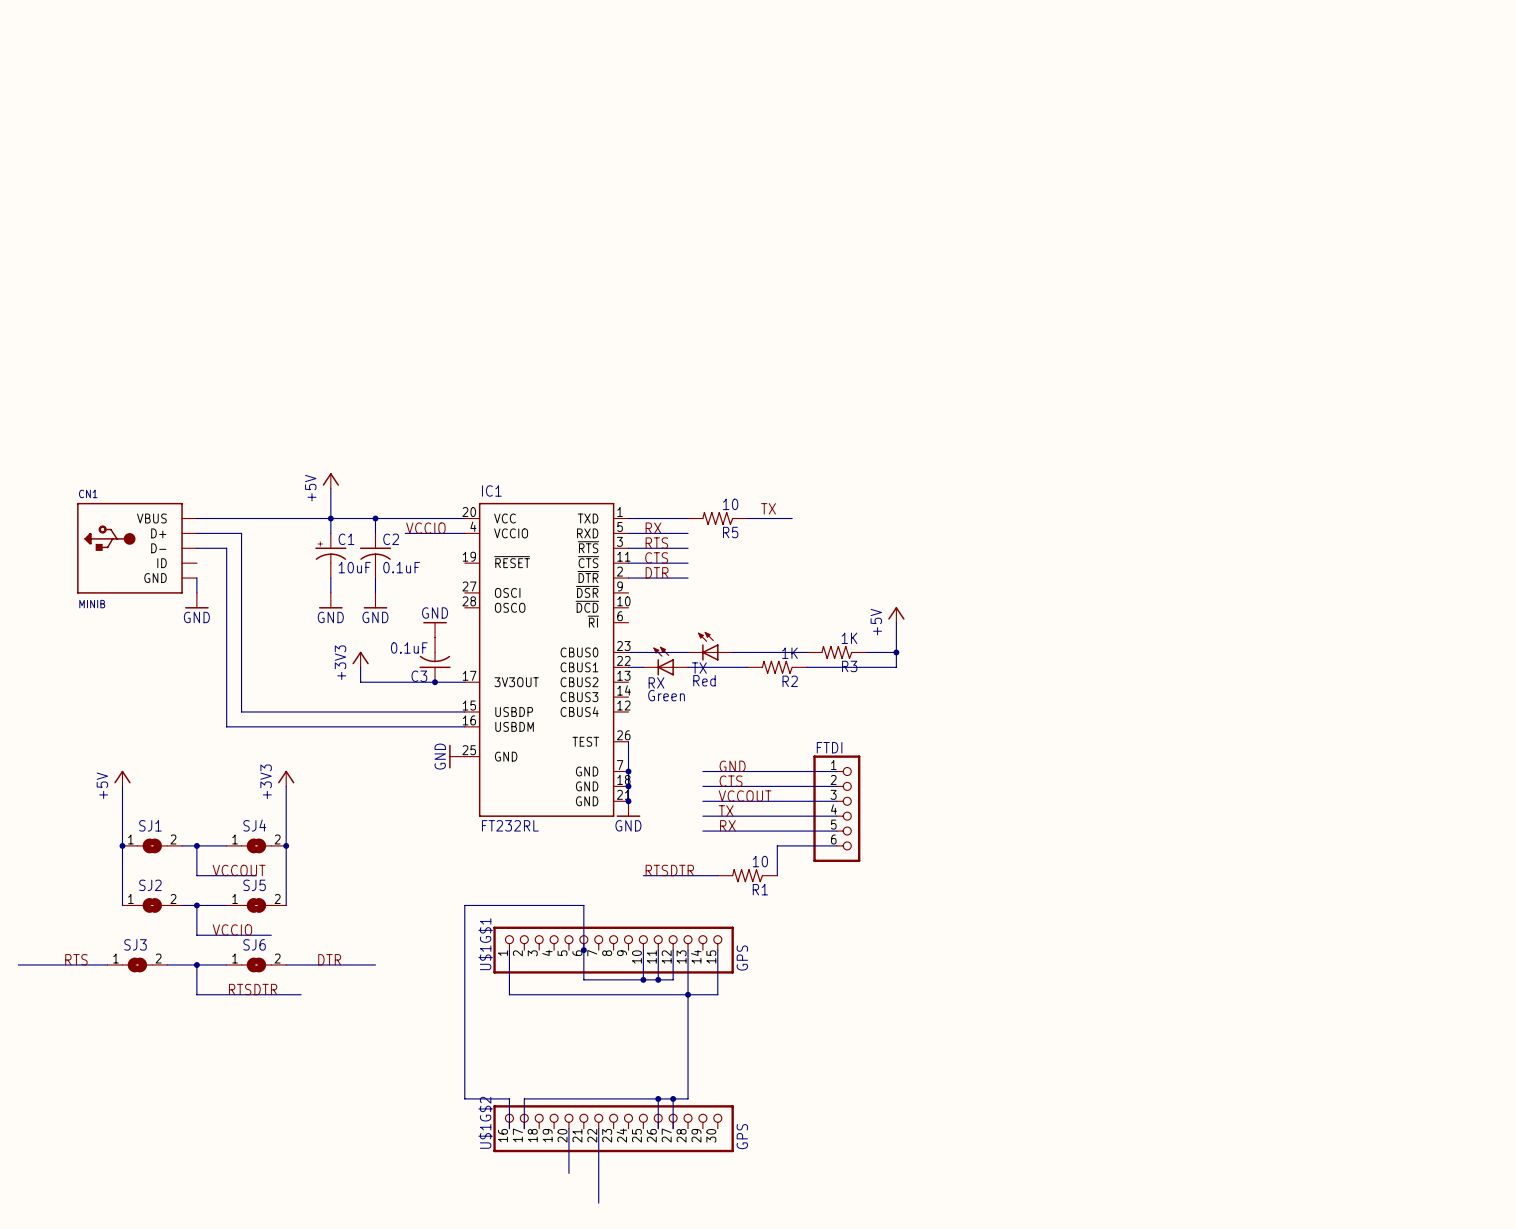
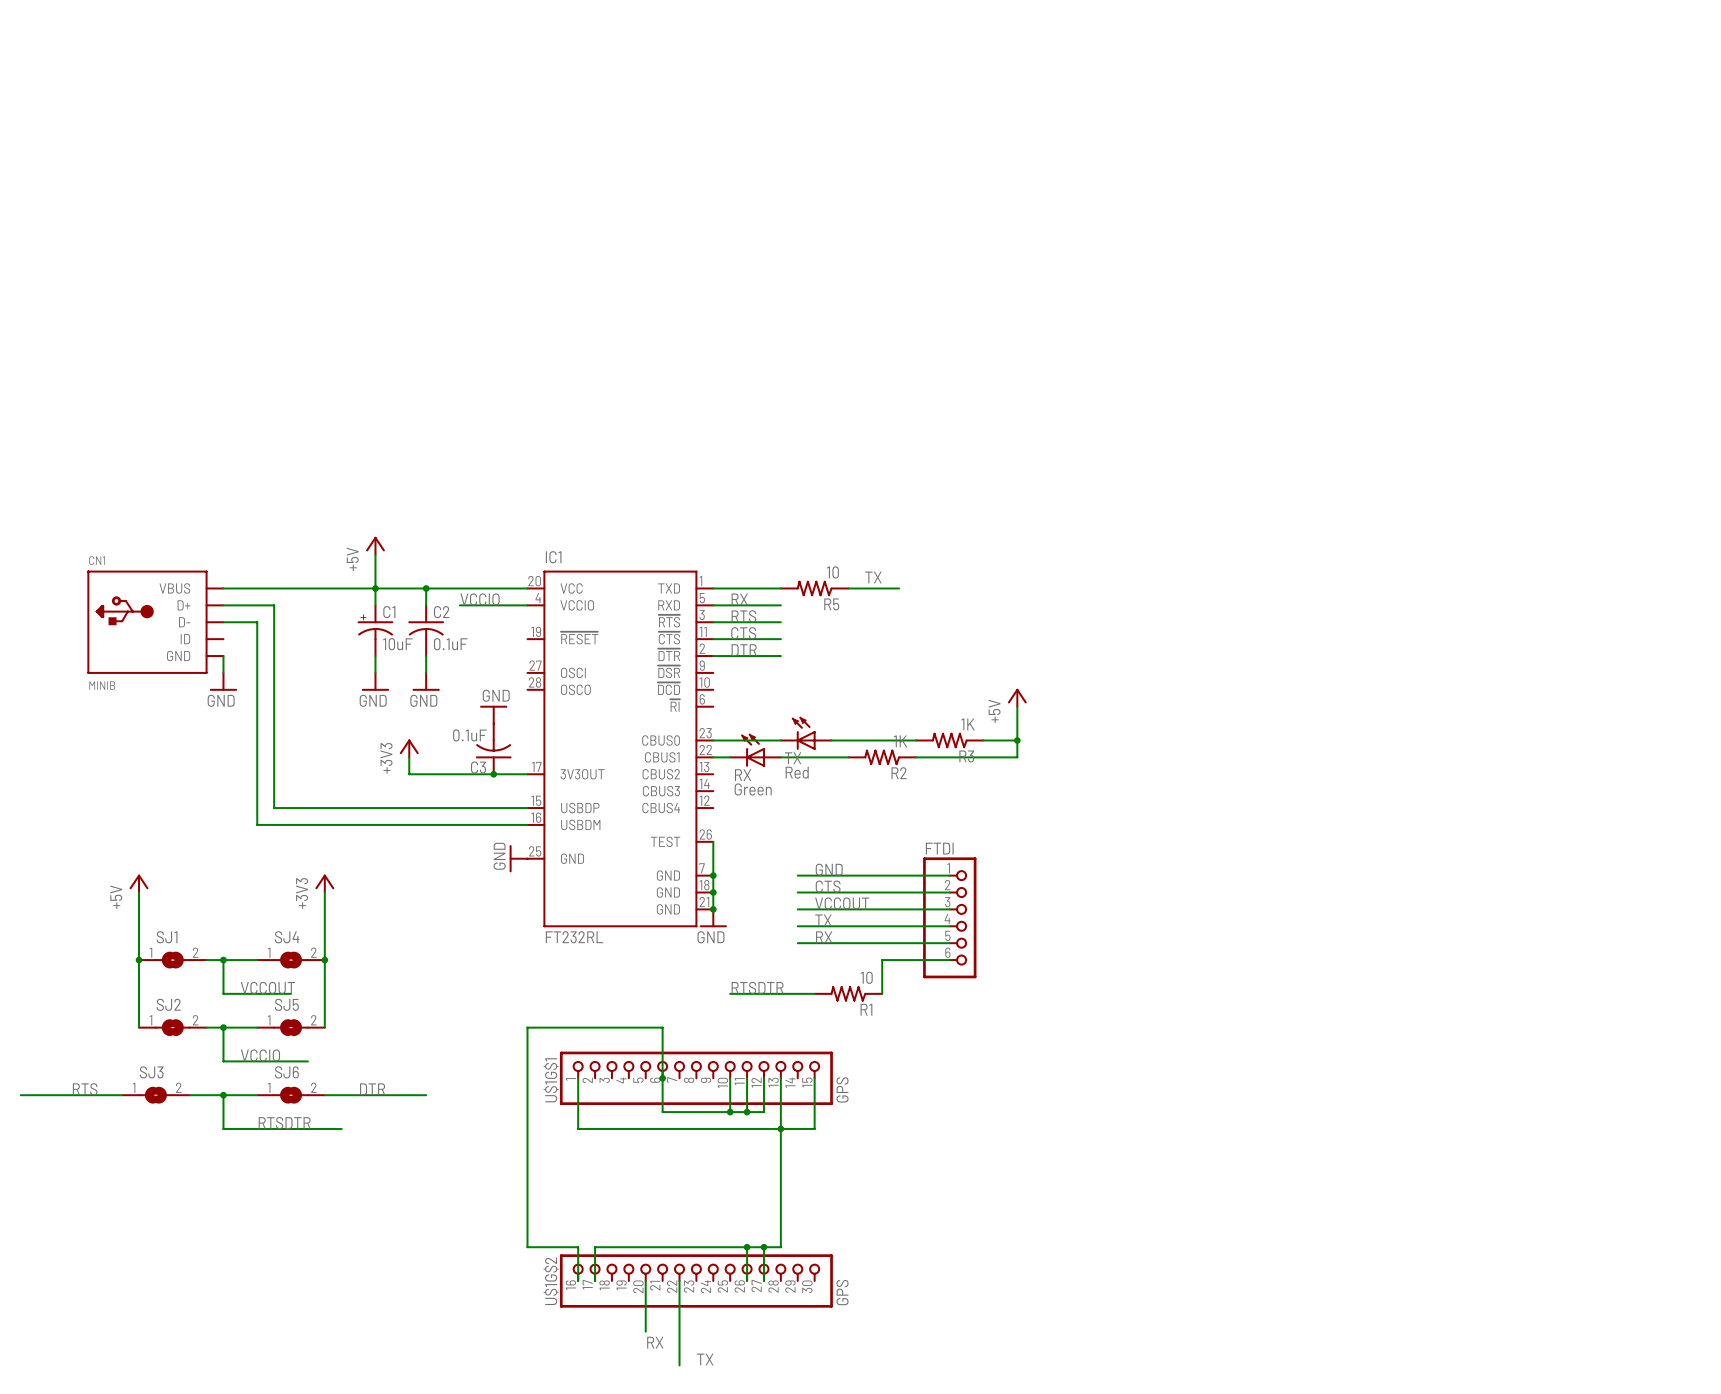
label: none -> RX (655, 1342)
label: none -> TX (705, 1359)

